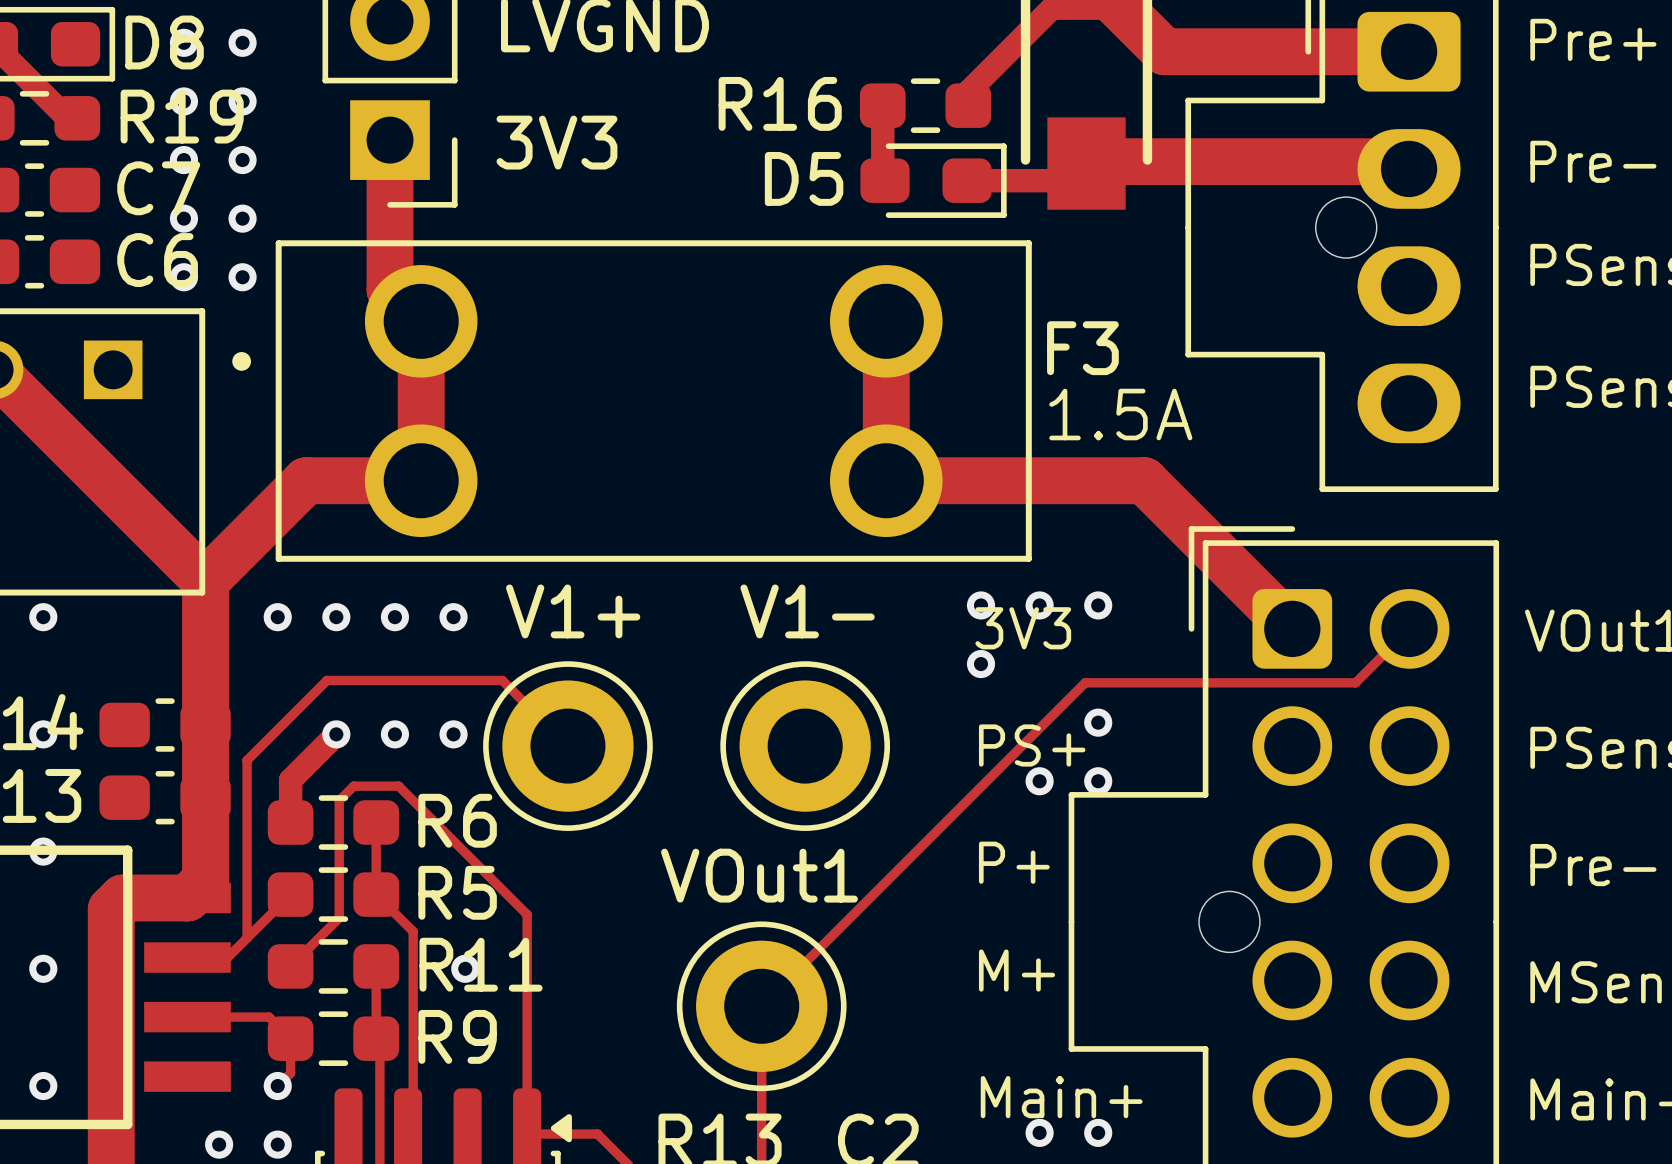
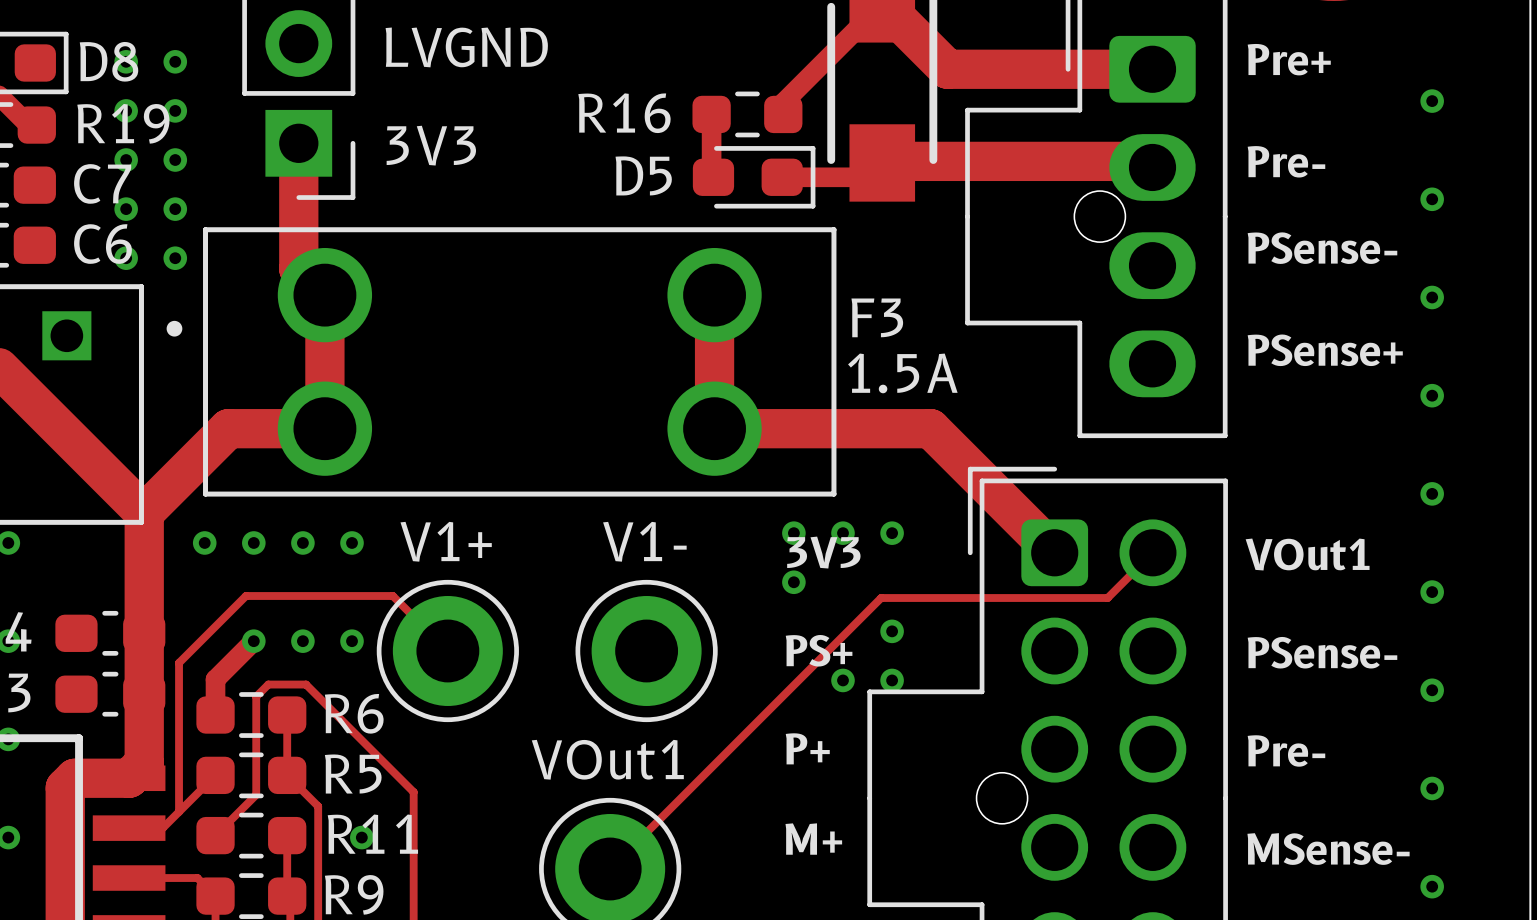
text: V1+ (573, 611) -> none
text: V1- (807, 611) -> none
part value: none -> V1+ (446, 541)
part value: none -> V1- (644, 541)

